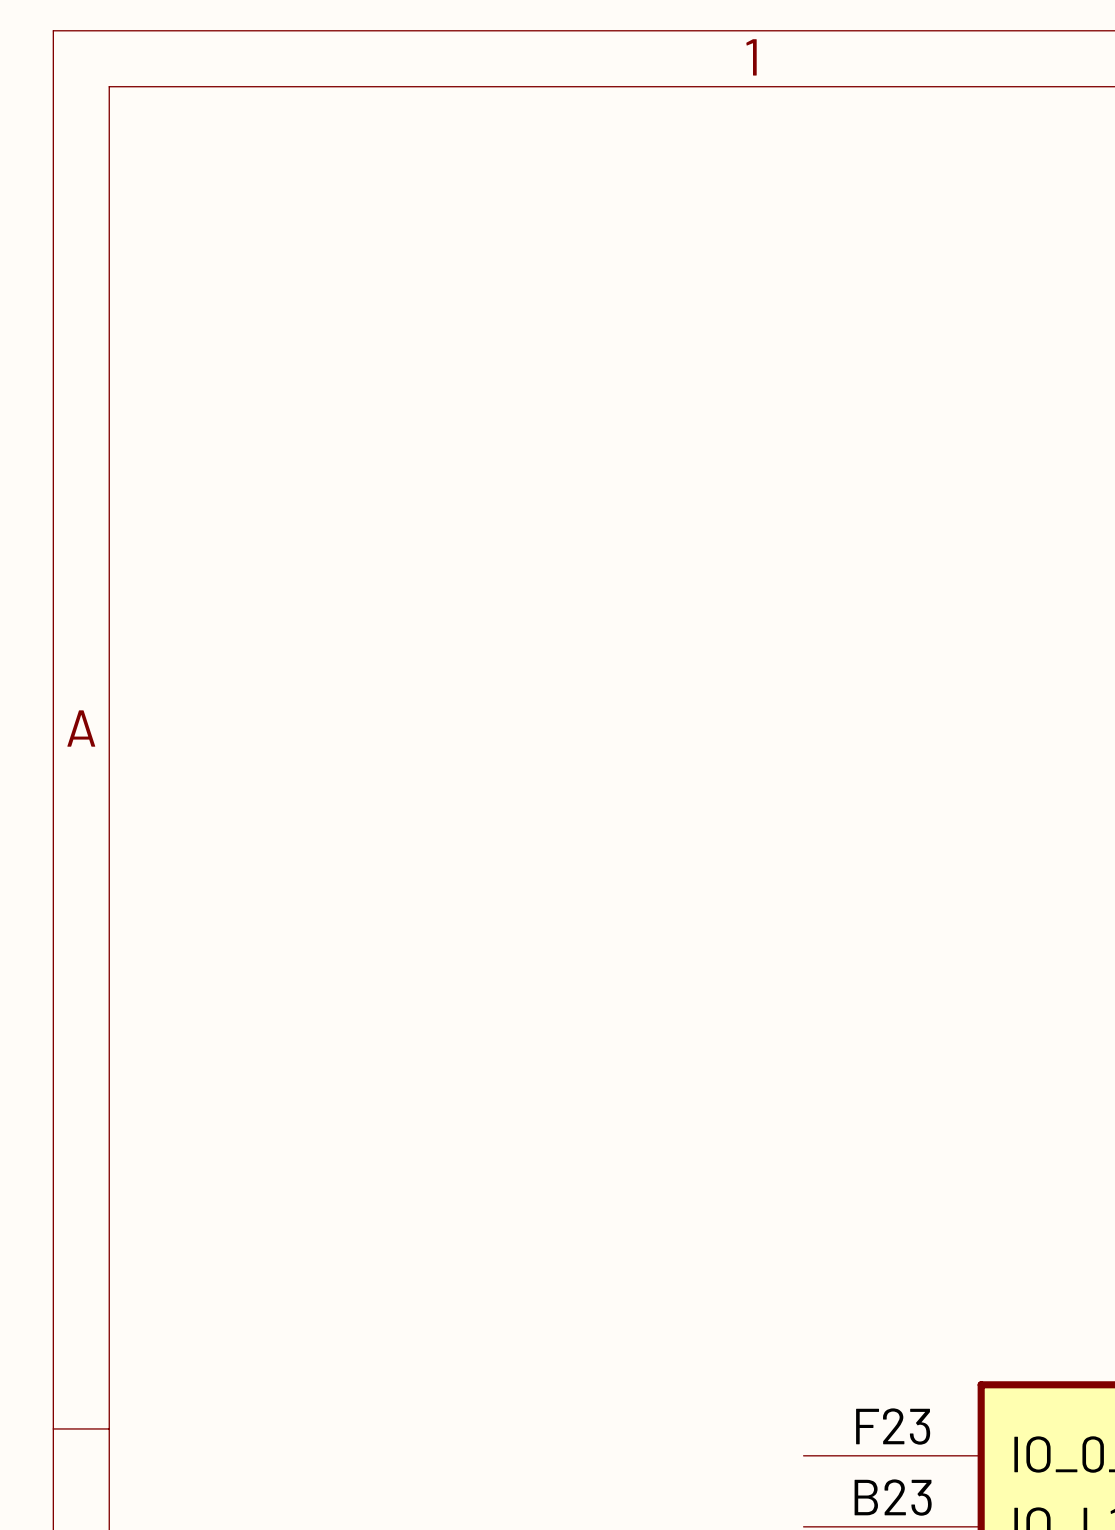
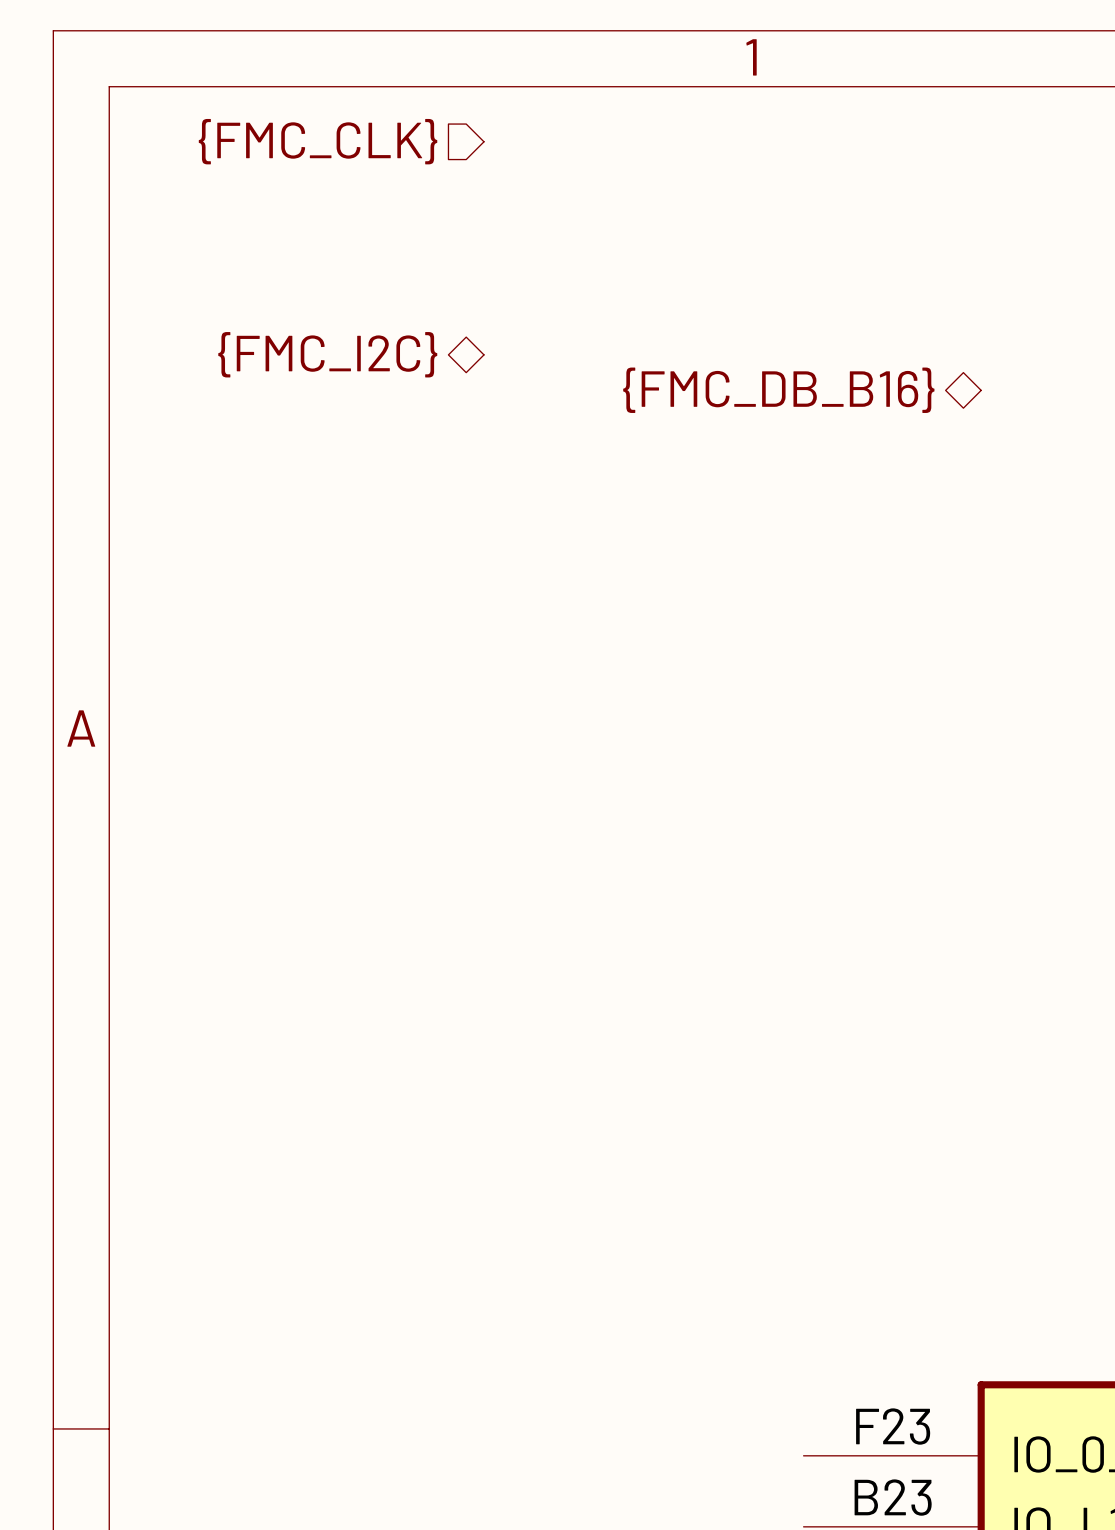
hierarchical label: none -> {FMC_CLK} (318, 141)
hierarchical label: none -> {FMC_I2C} (327, 354)
hierarchical label: none -> {FMC_DB_B16} (778, 390)

